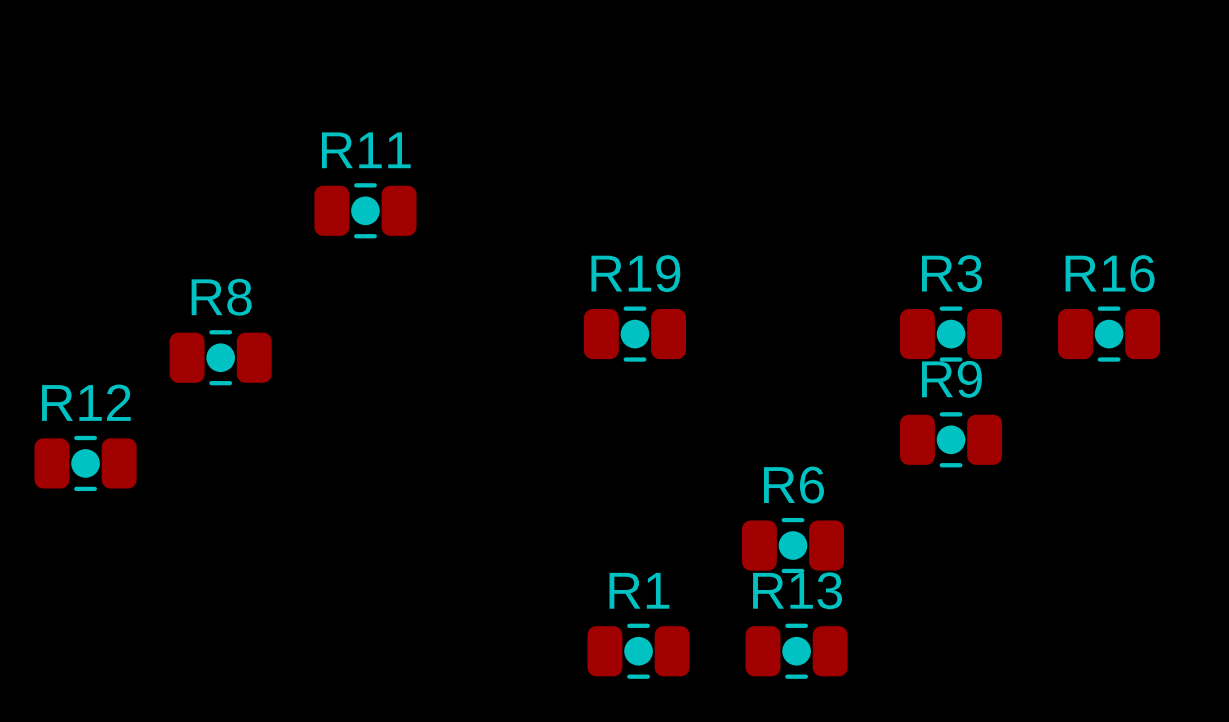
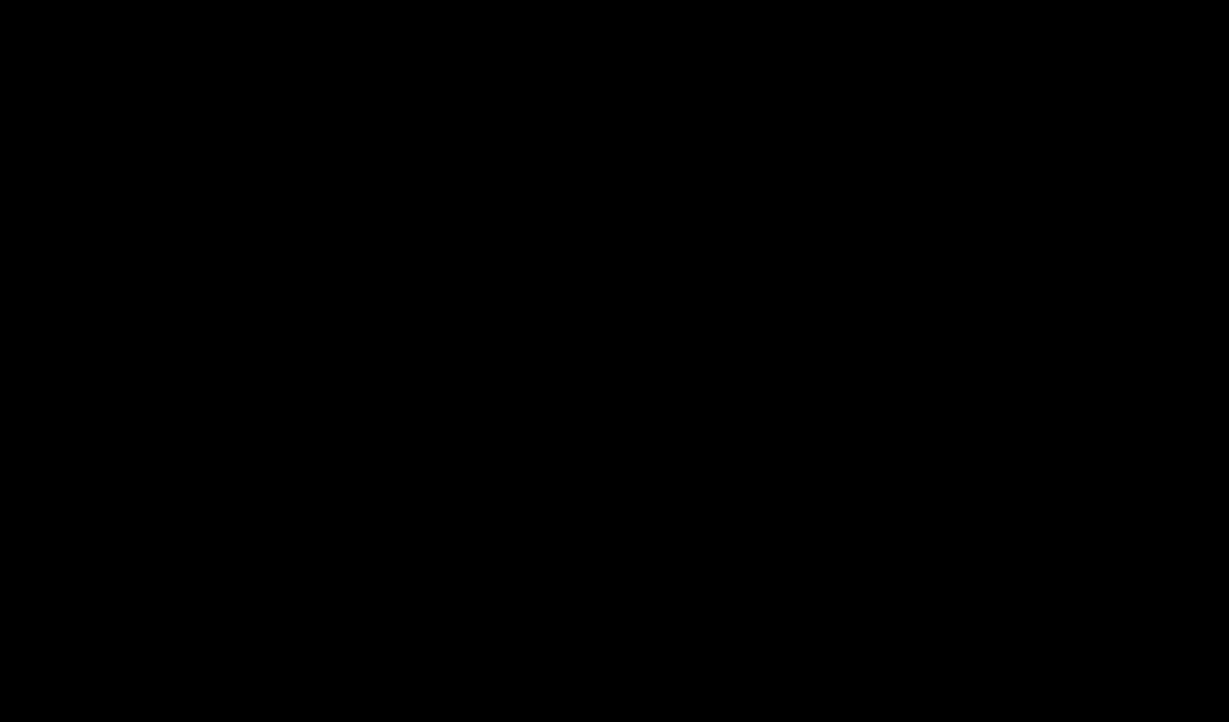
R11: (365, 210) -> none
R19: (634, 334) -> none
R3: (951, 334) -> none
R16: (1109, 334) -> none
R8: (220, 357) -> none
R9: (951, 439) -> none
R12: (85, 463) -> none
R6: (793, 545) -> none
R1: (638, 651) -> none
R13: (796, 651) -> none

